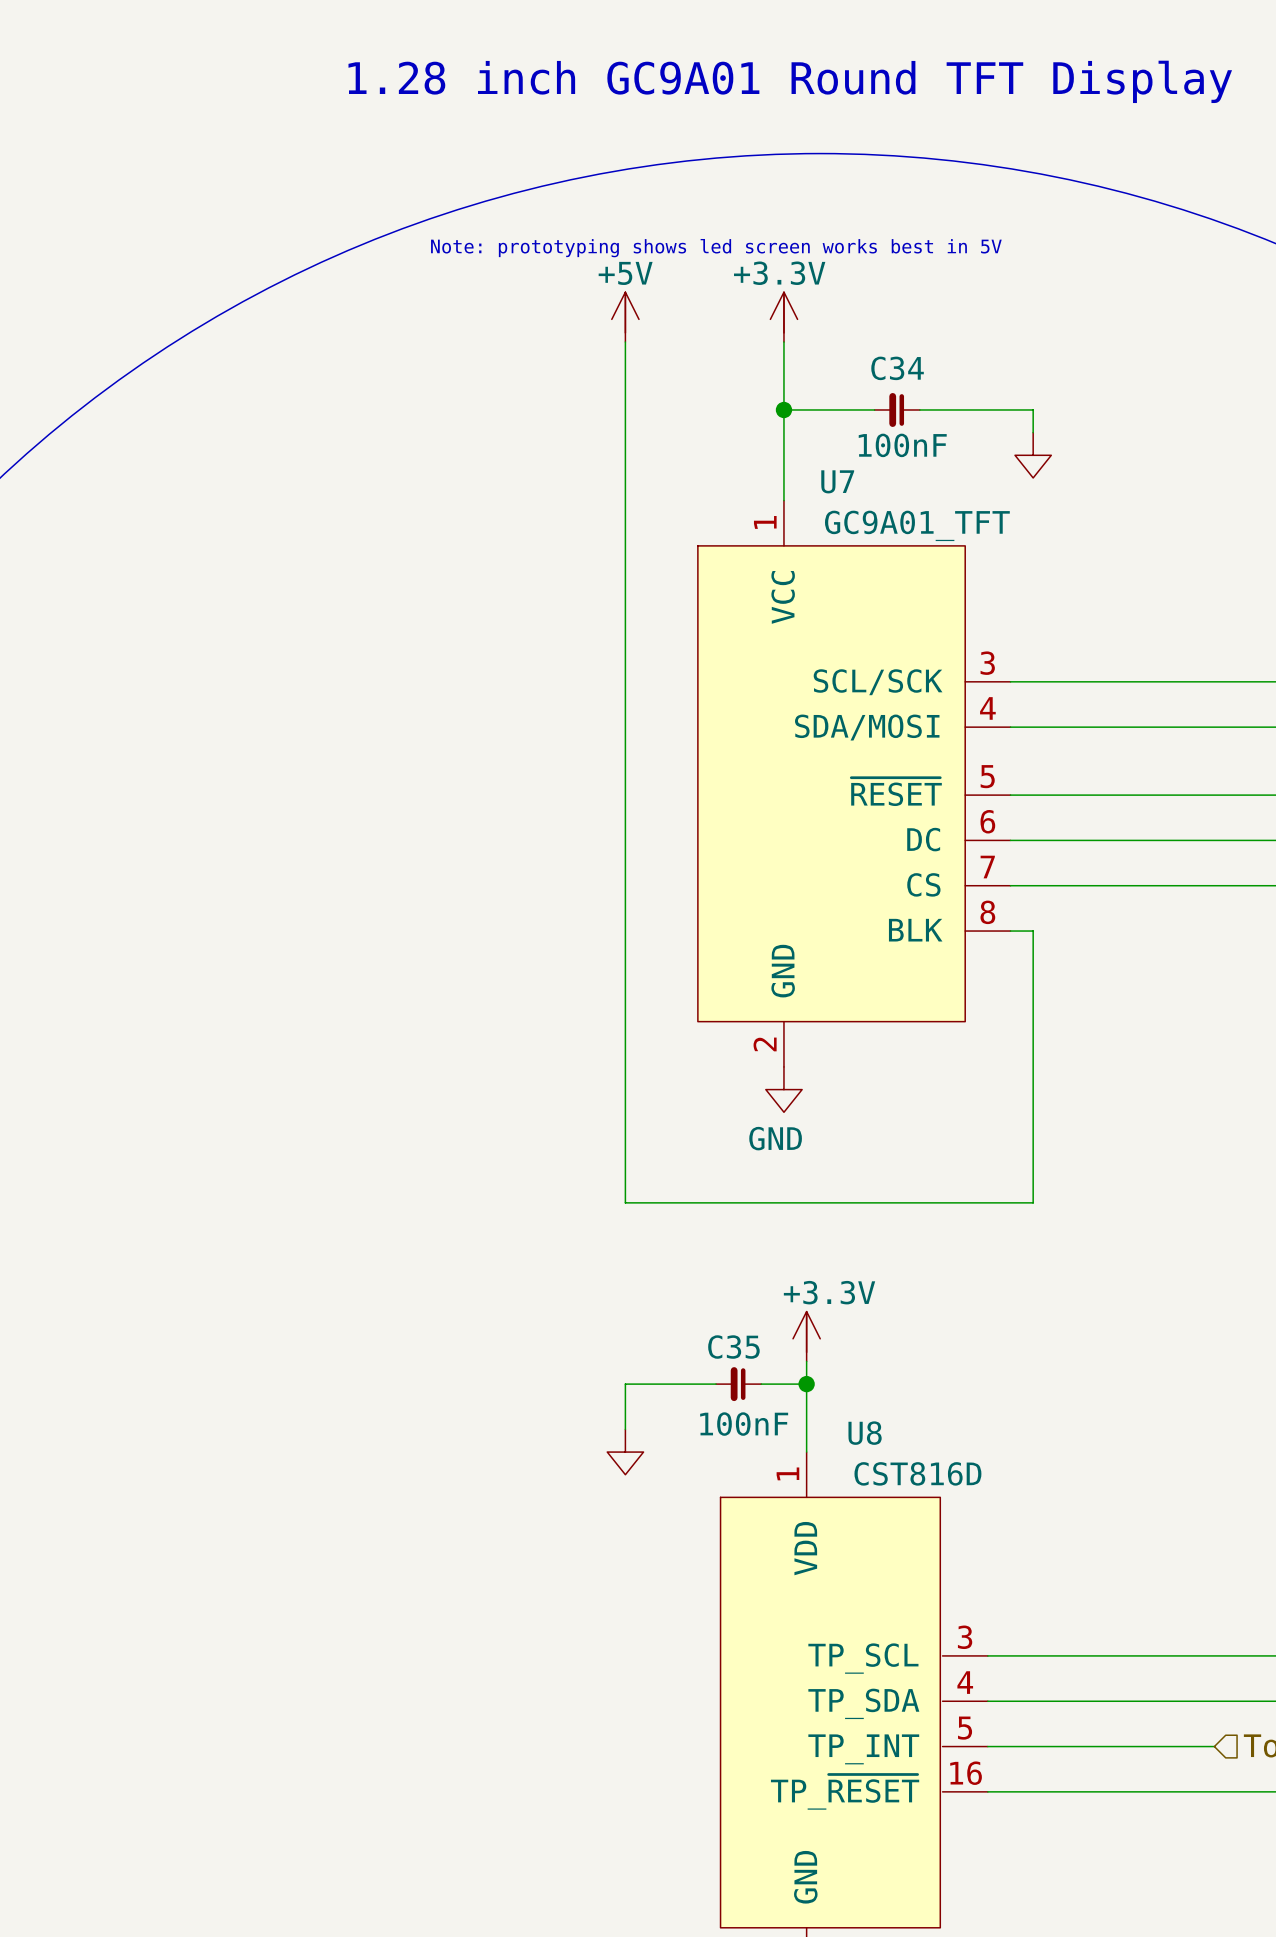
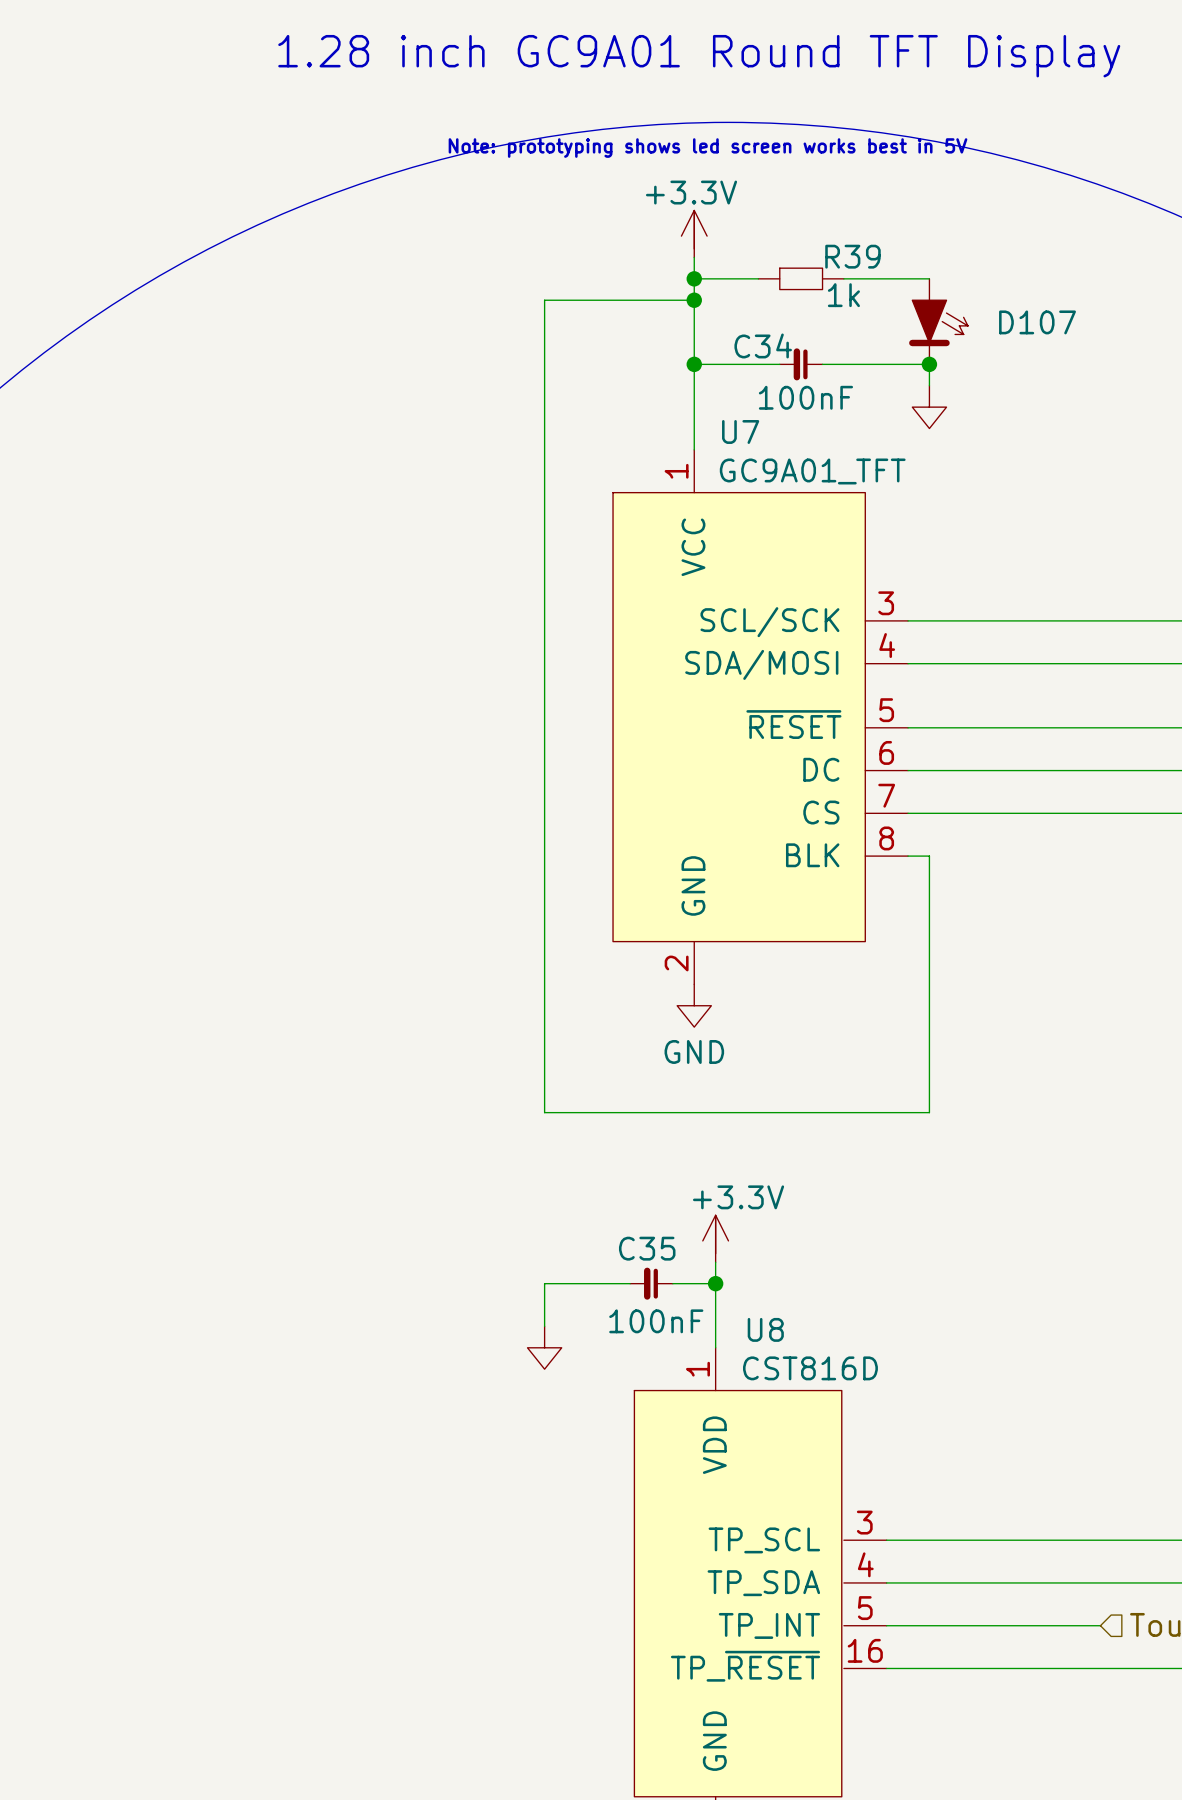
text position: Note: prototyping shows led screen works best in 5V (716, 248) -> Note: prototyping shows led screen works best in 5V (708, 148)
wire: none -> (694, 257) (694, 300) (544, 300)
power symbol: +5V (625, 317) -> none
power symbol position: +3.3V (783, 317) -> +3.3V (694, 233)
wire: none -> (694, 278) (758, 278)
junction: none -> (694, 278)
R39: none -> 1k (801, 278)
wire: none -> (843, 278) (929, 278)
junction: none -> (694, 300)
D107: none -> (938, 321)
C34 name position: C34 (897, 368) -> C34 (763, 345)
junction: none -> (929, 364)

